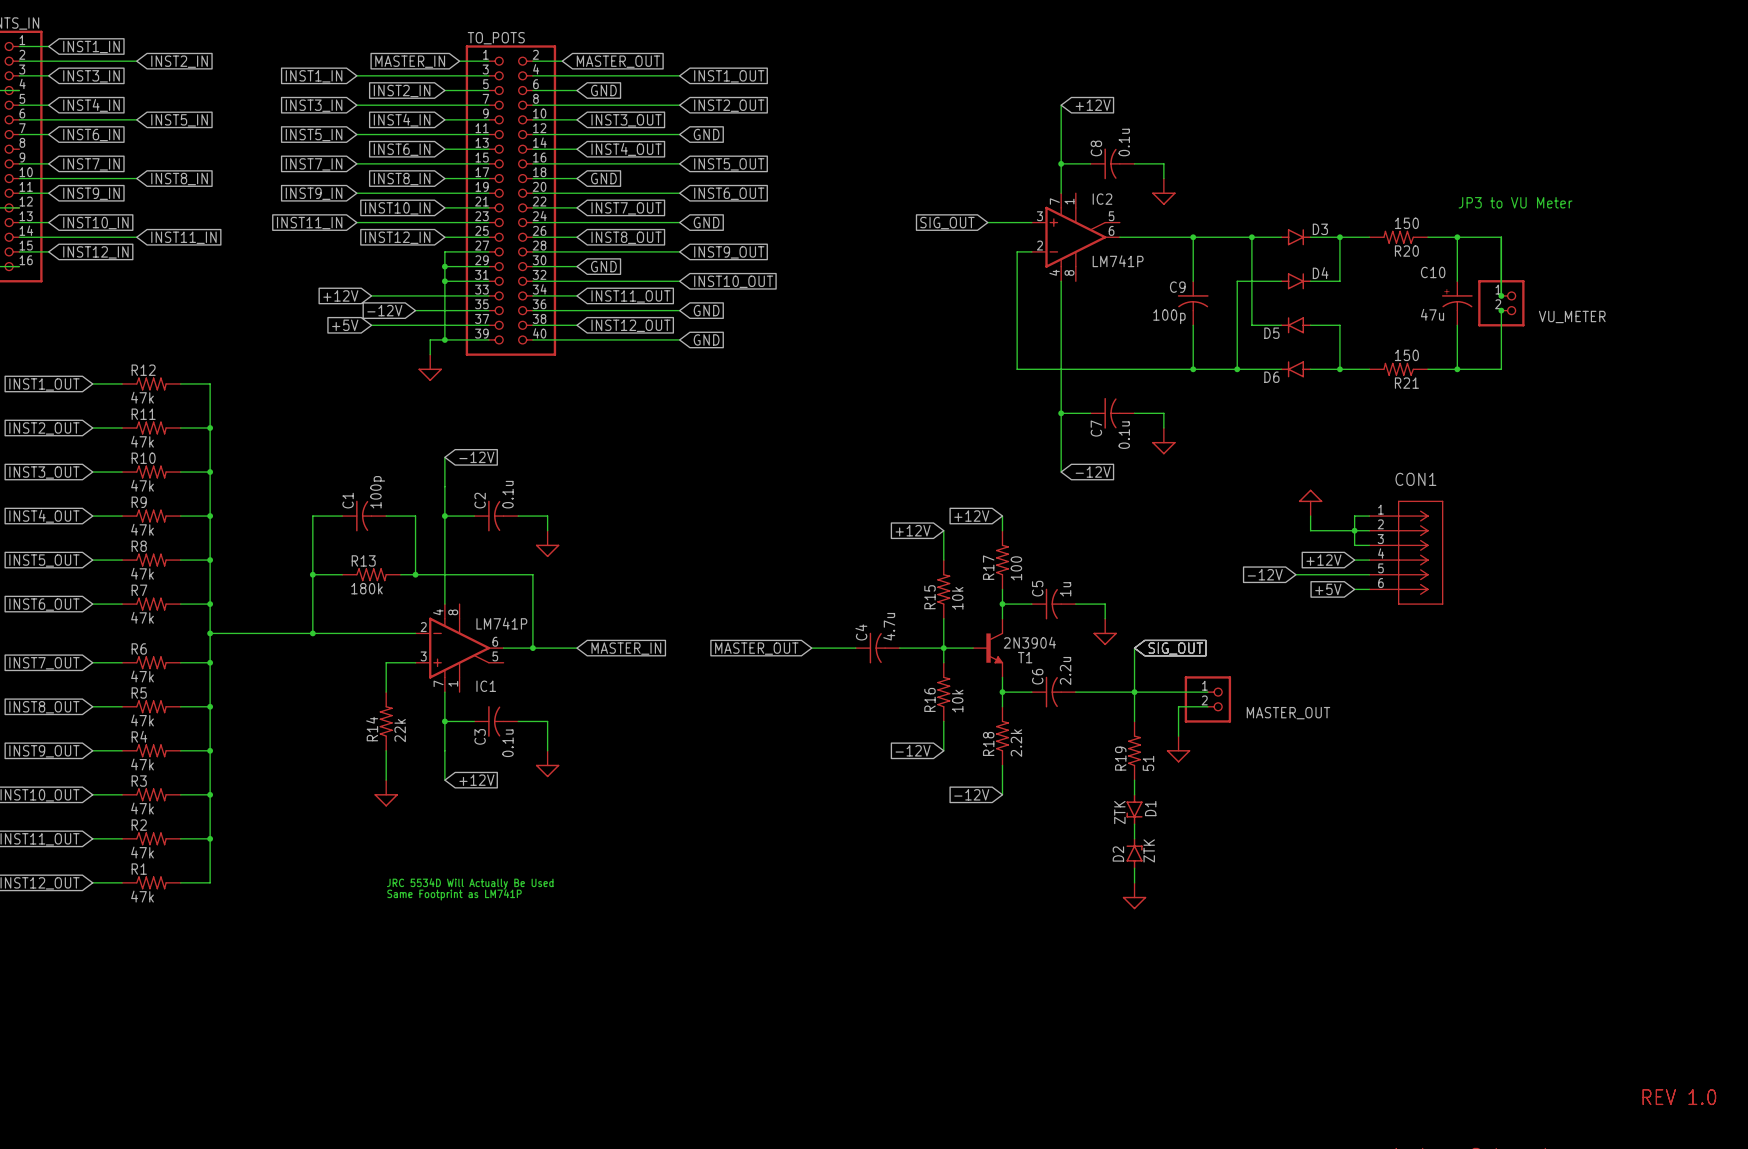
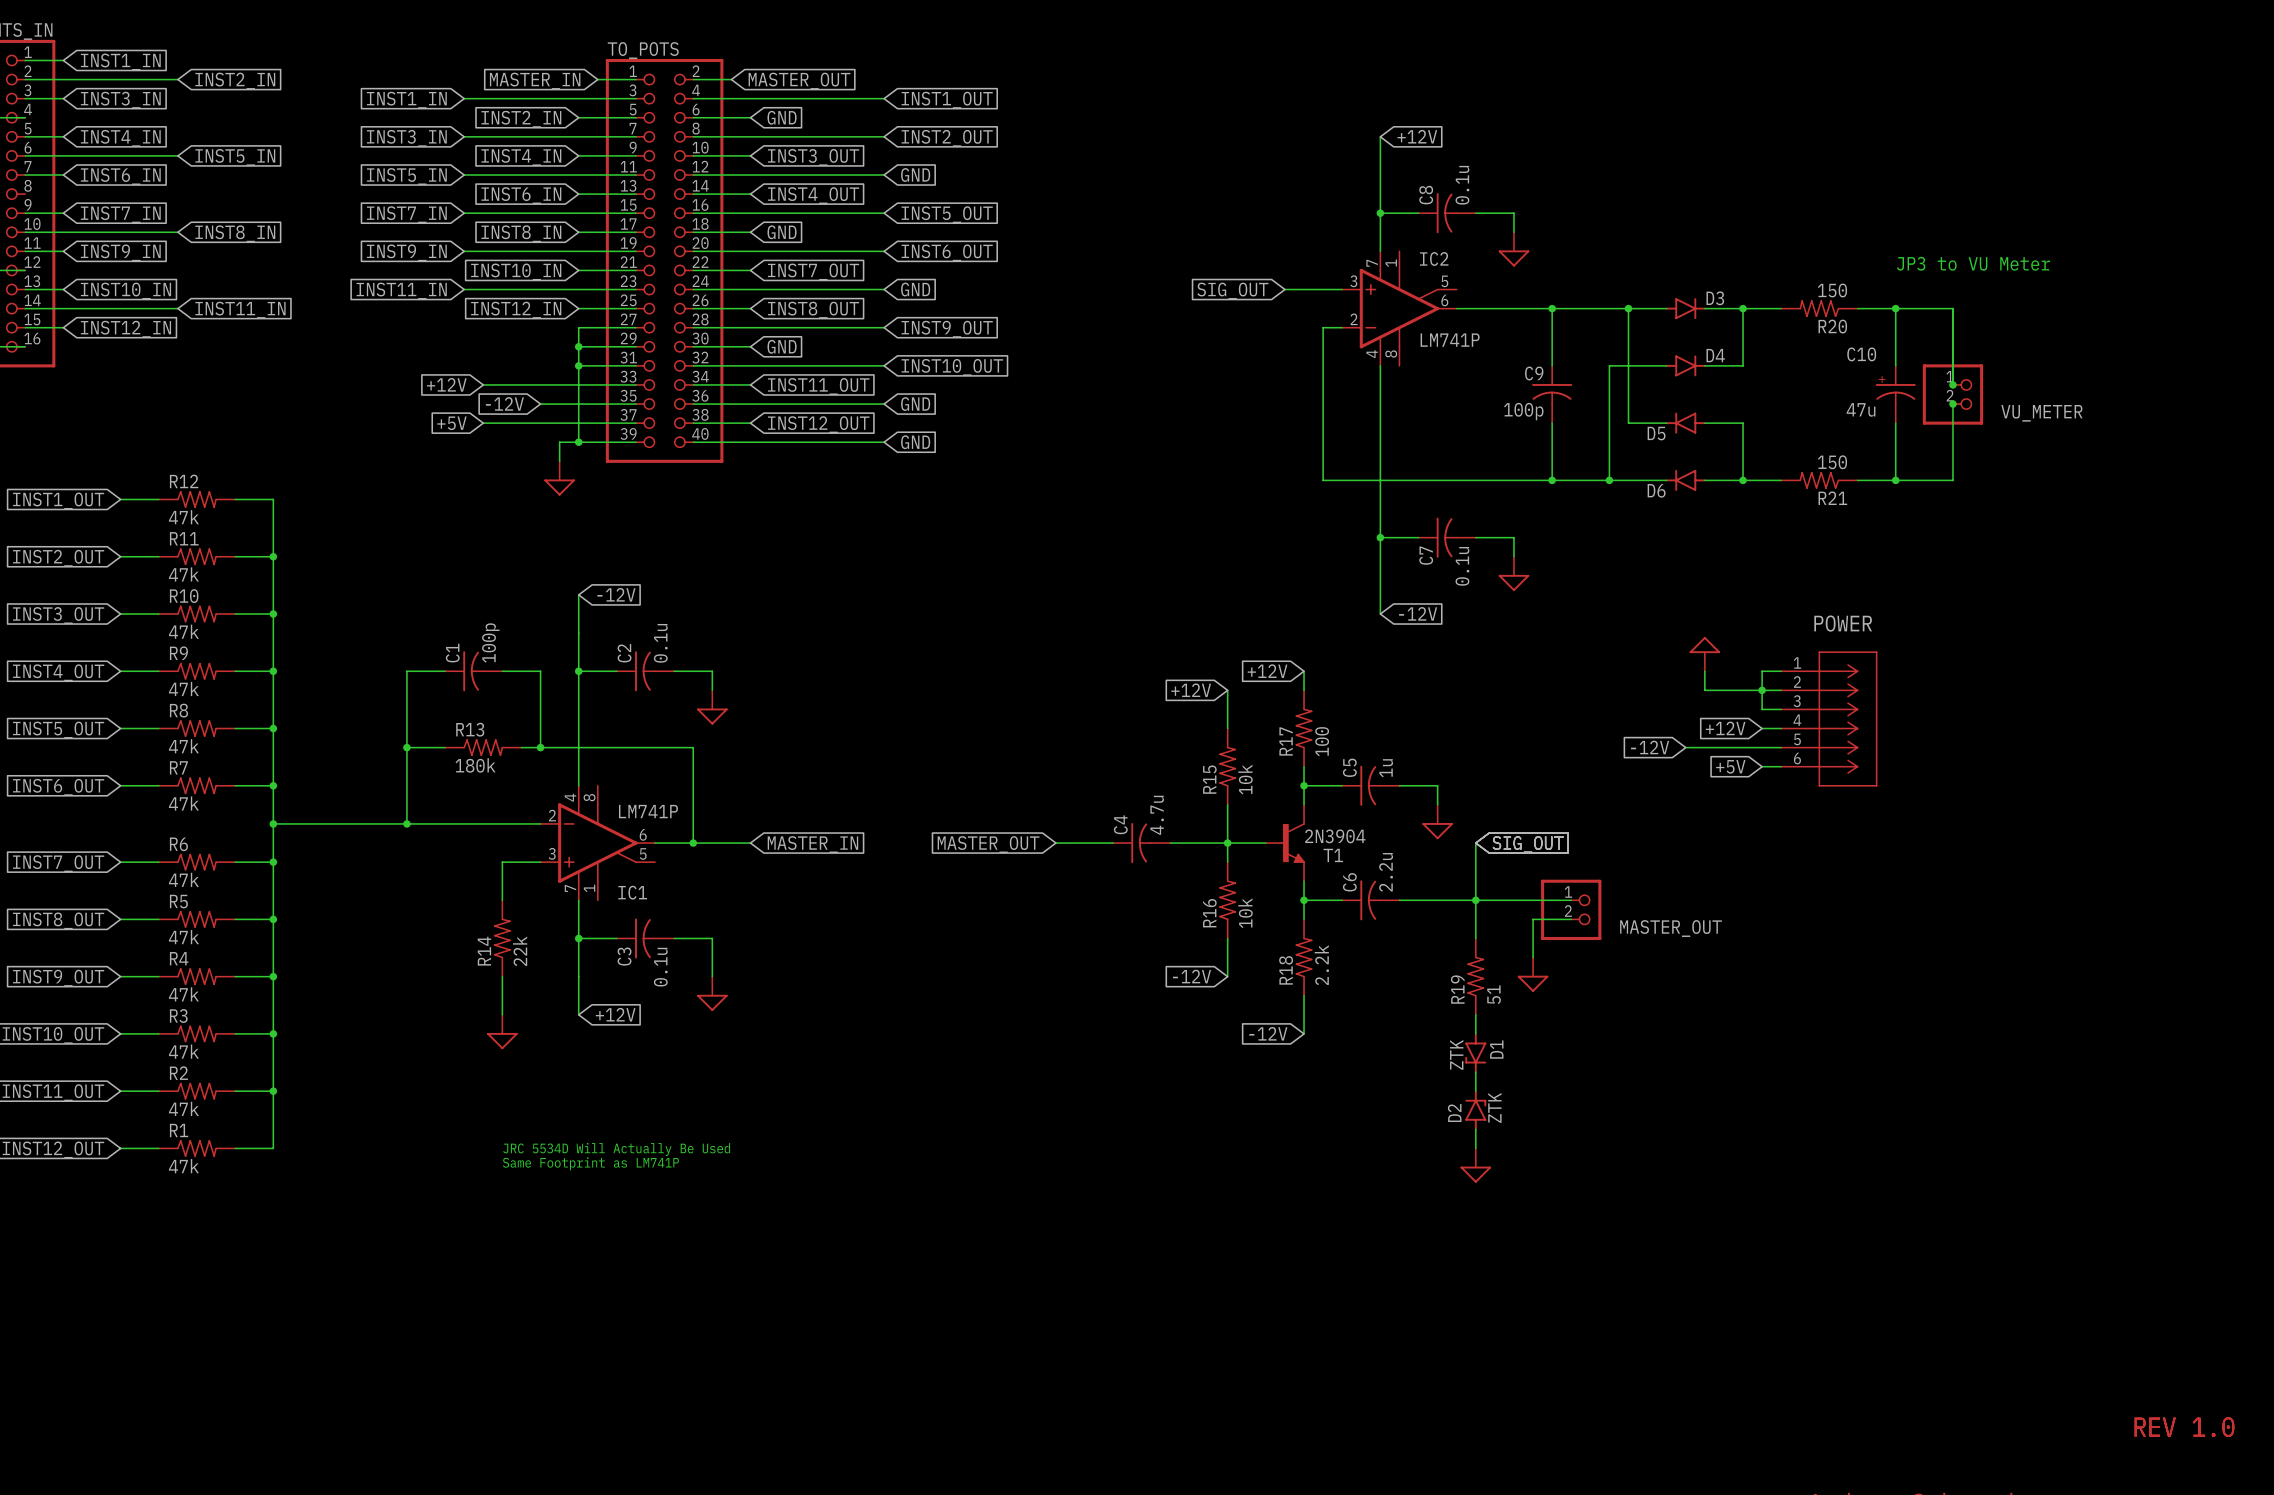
CON1 name: CON1 (1415, 479) -> POWER (1843, 623)

